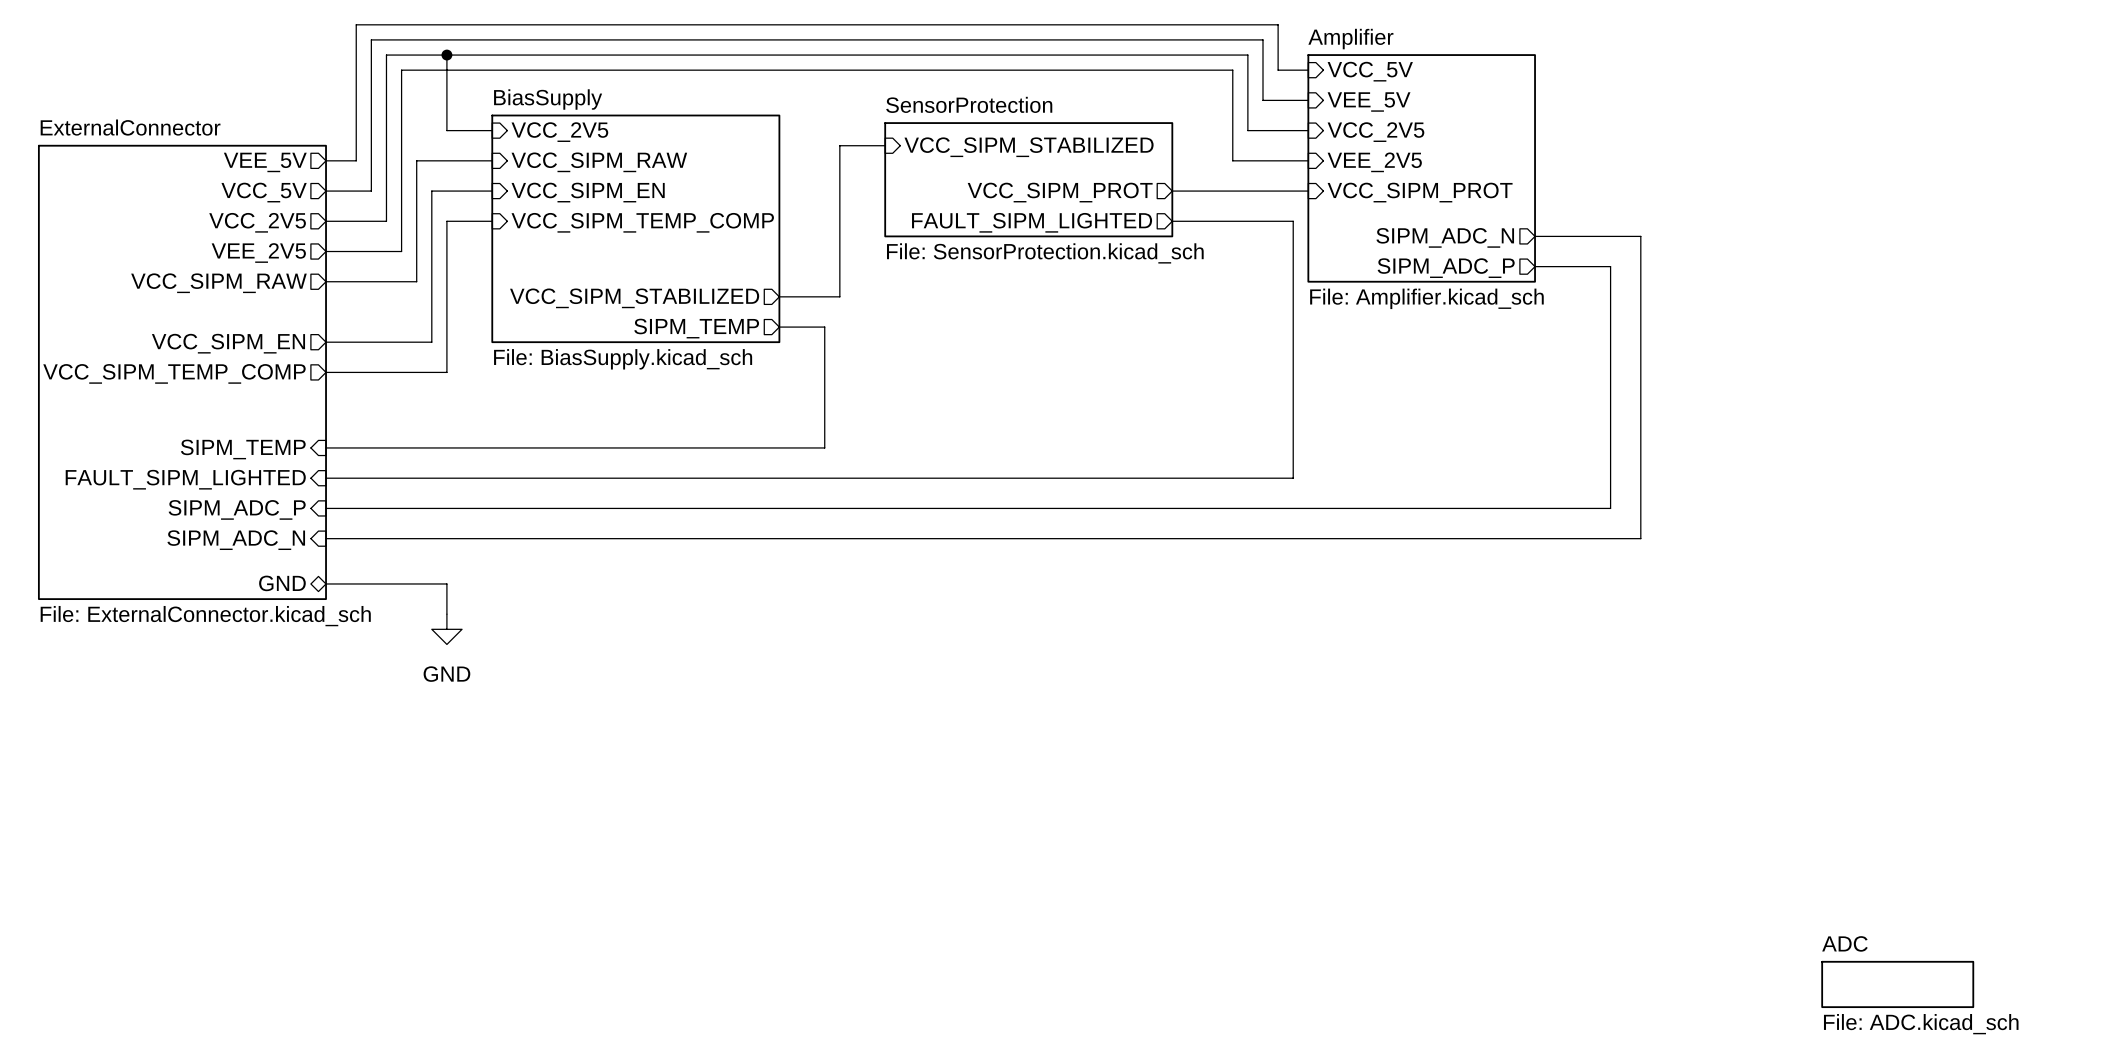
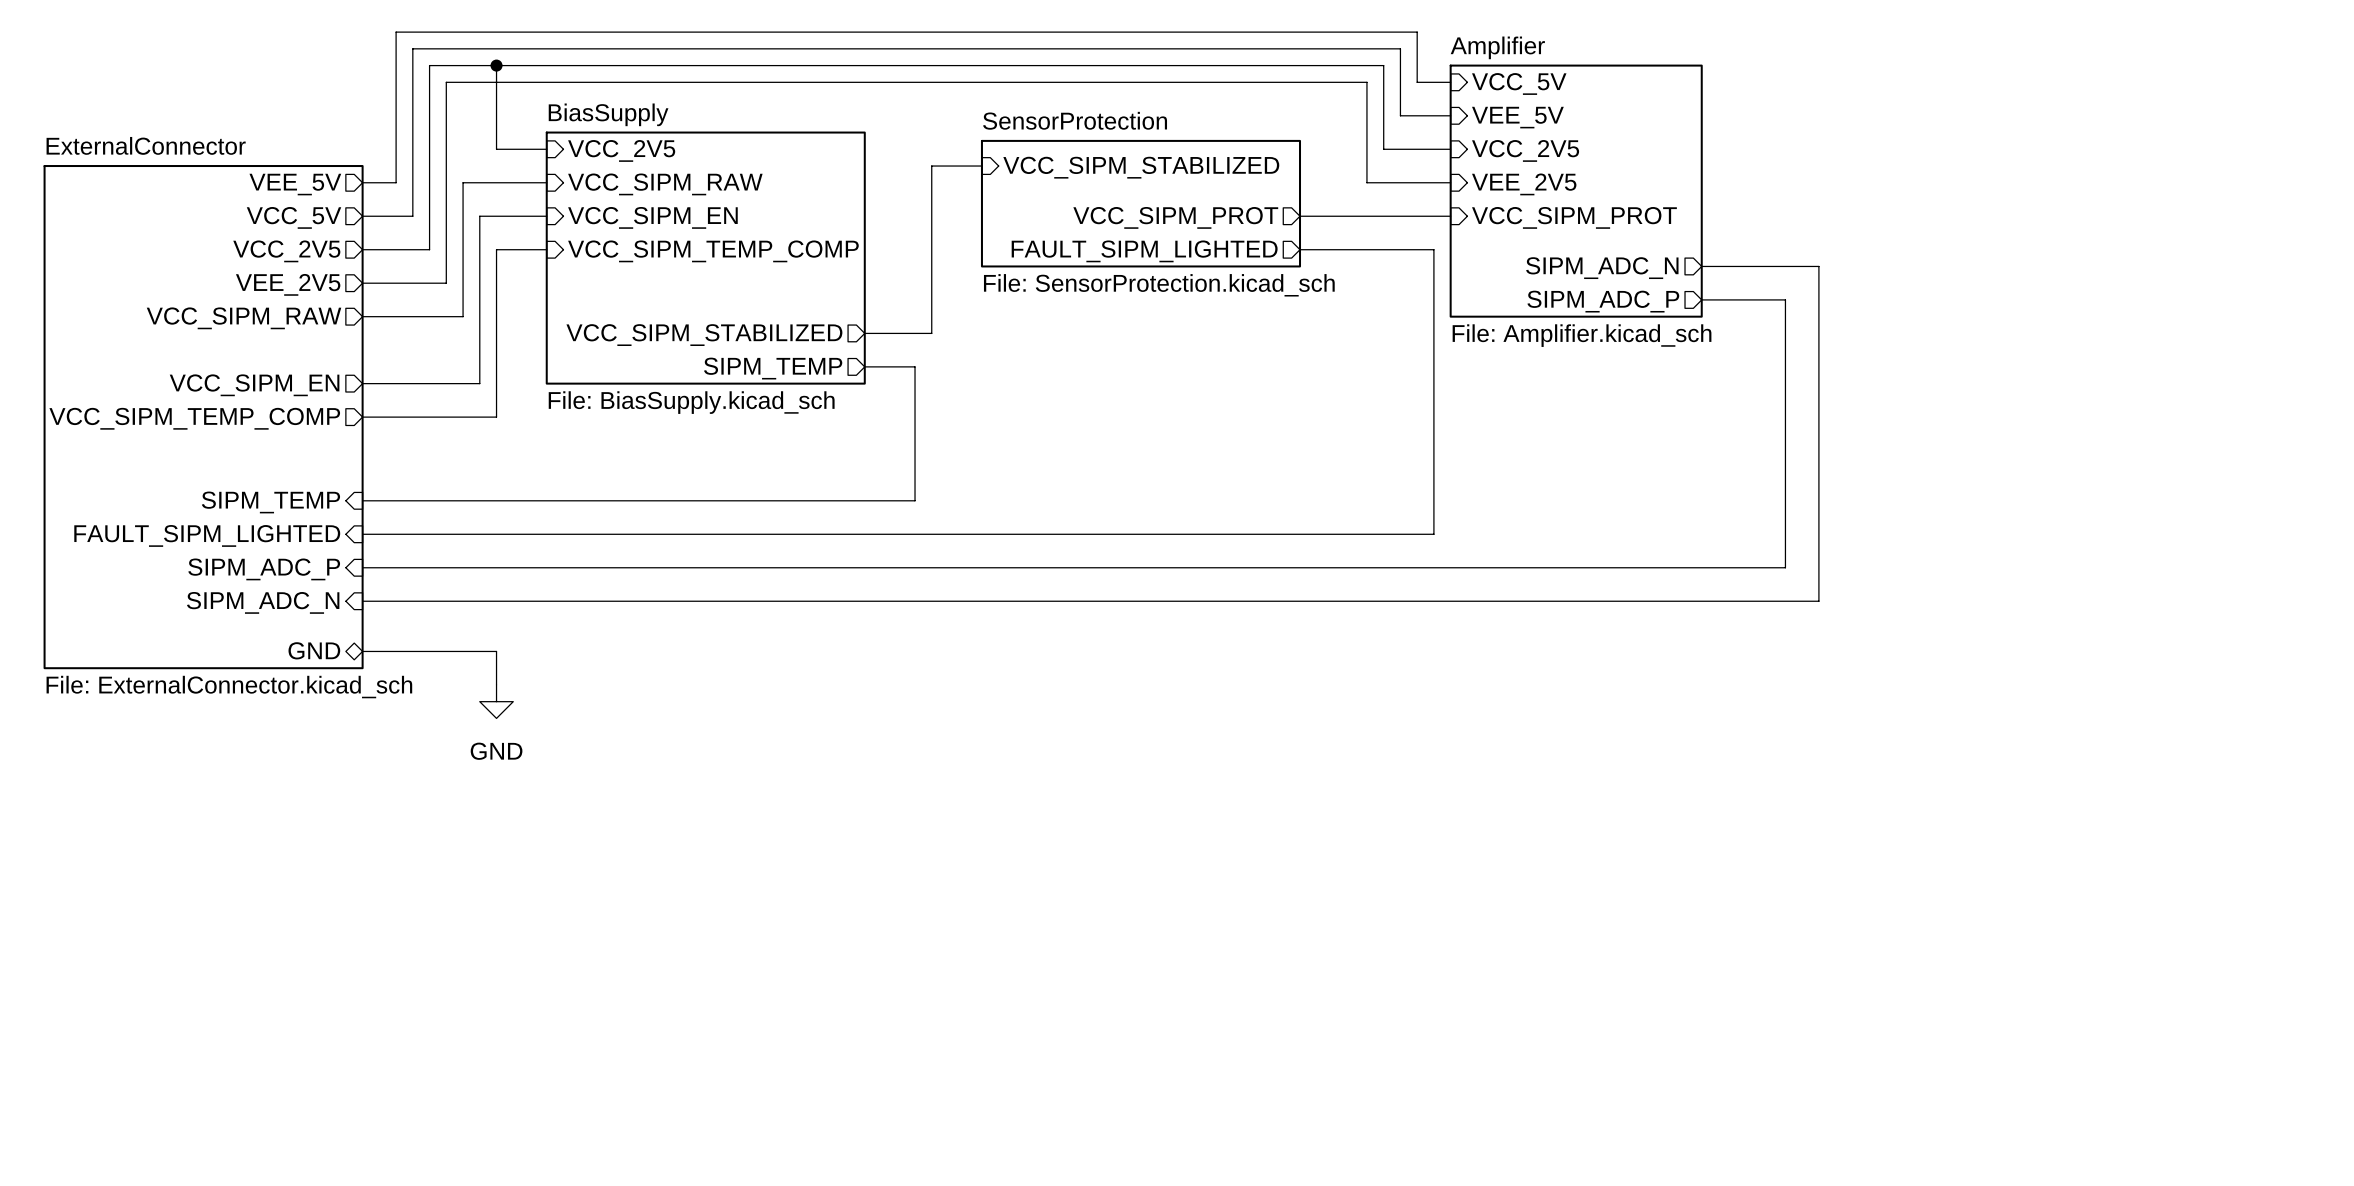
sheet ADC: File: ADC.kicad_sch (1897, 984) -> none

